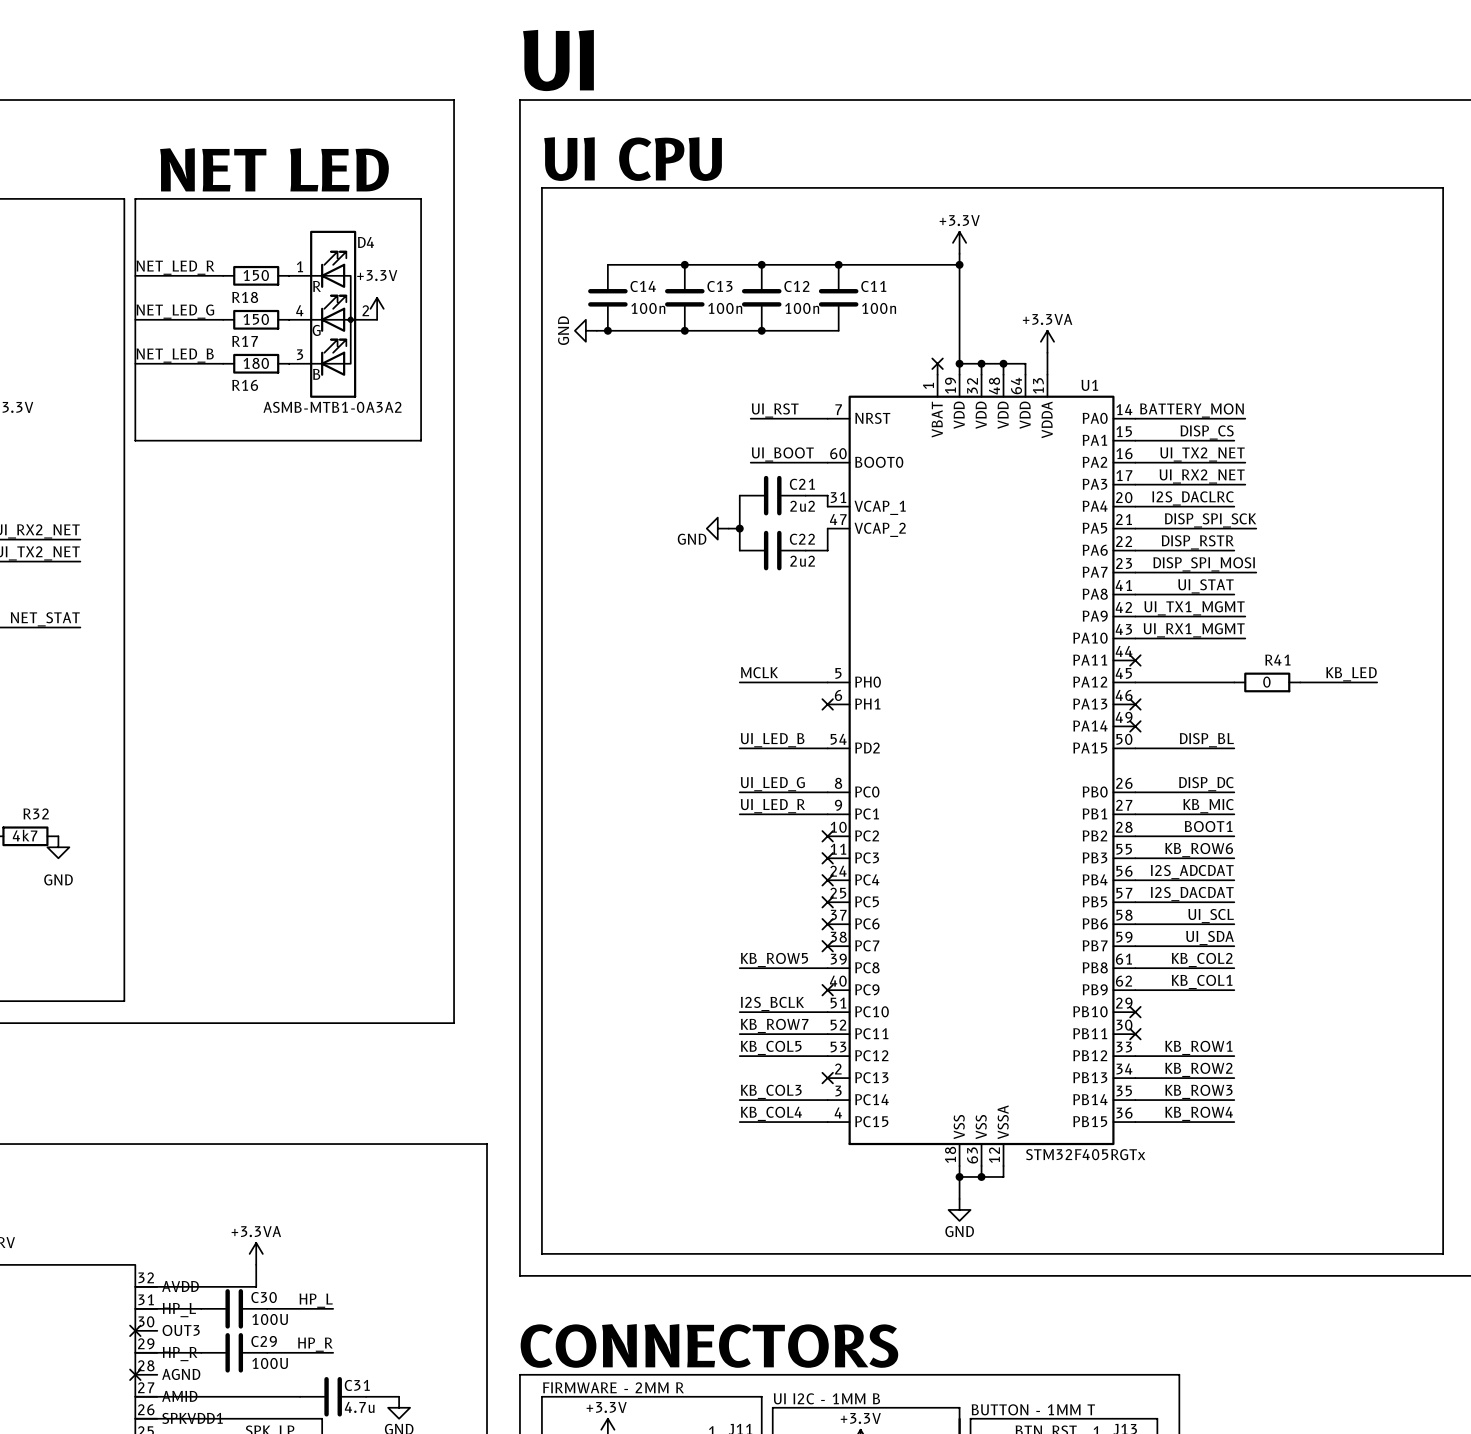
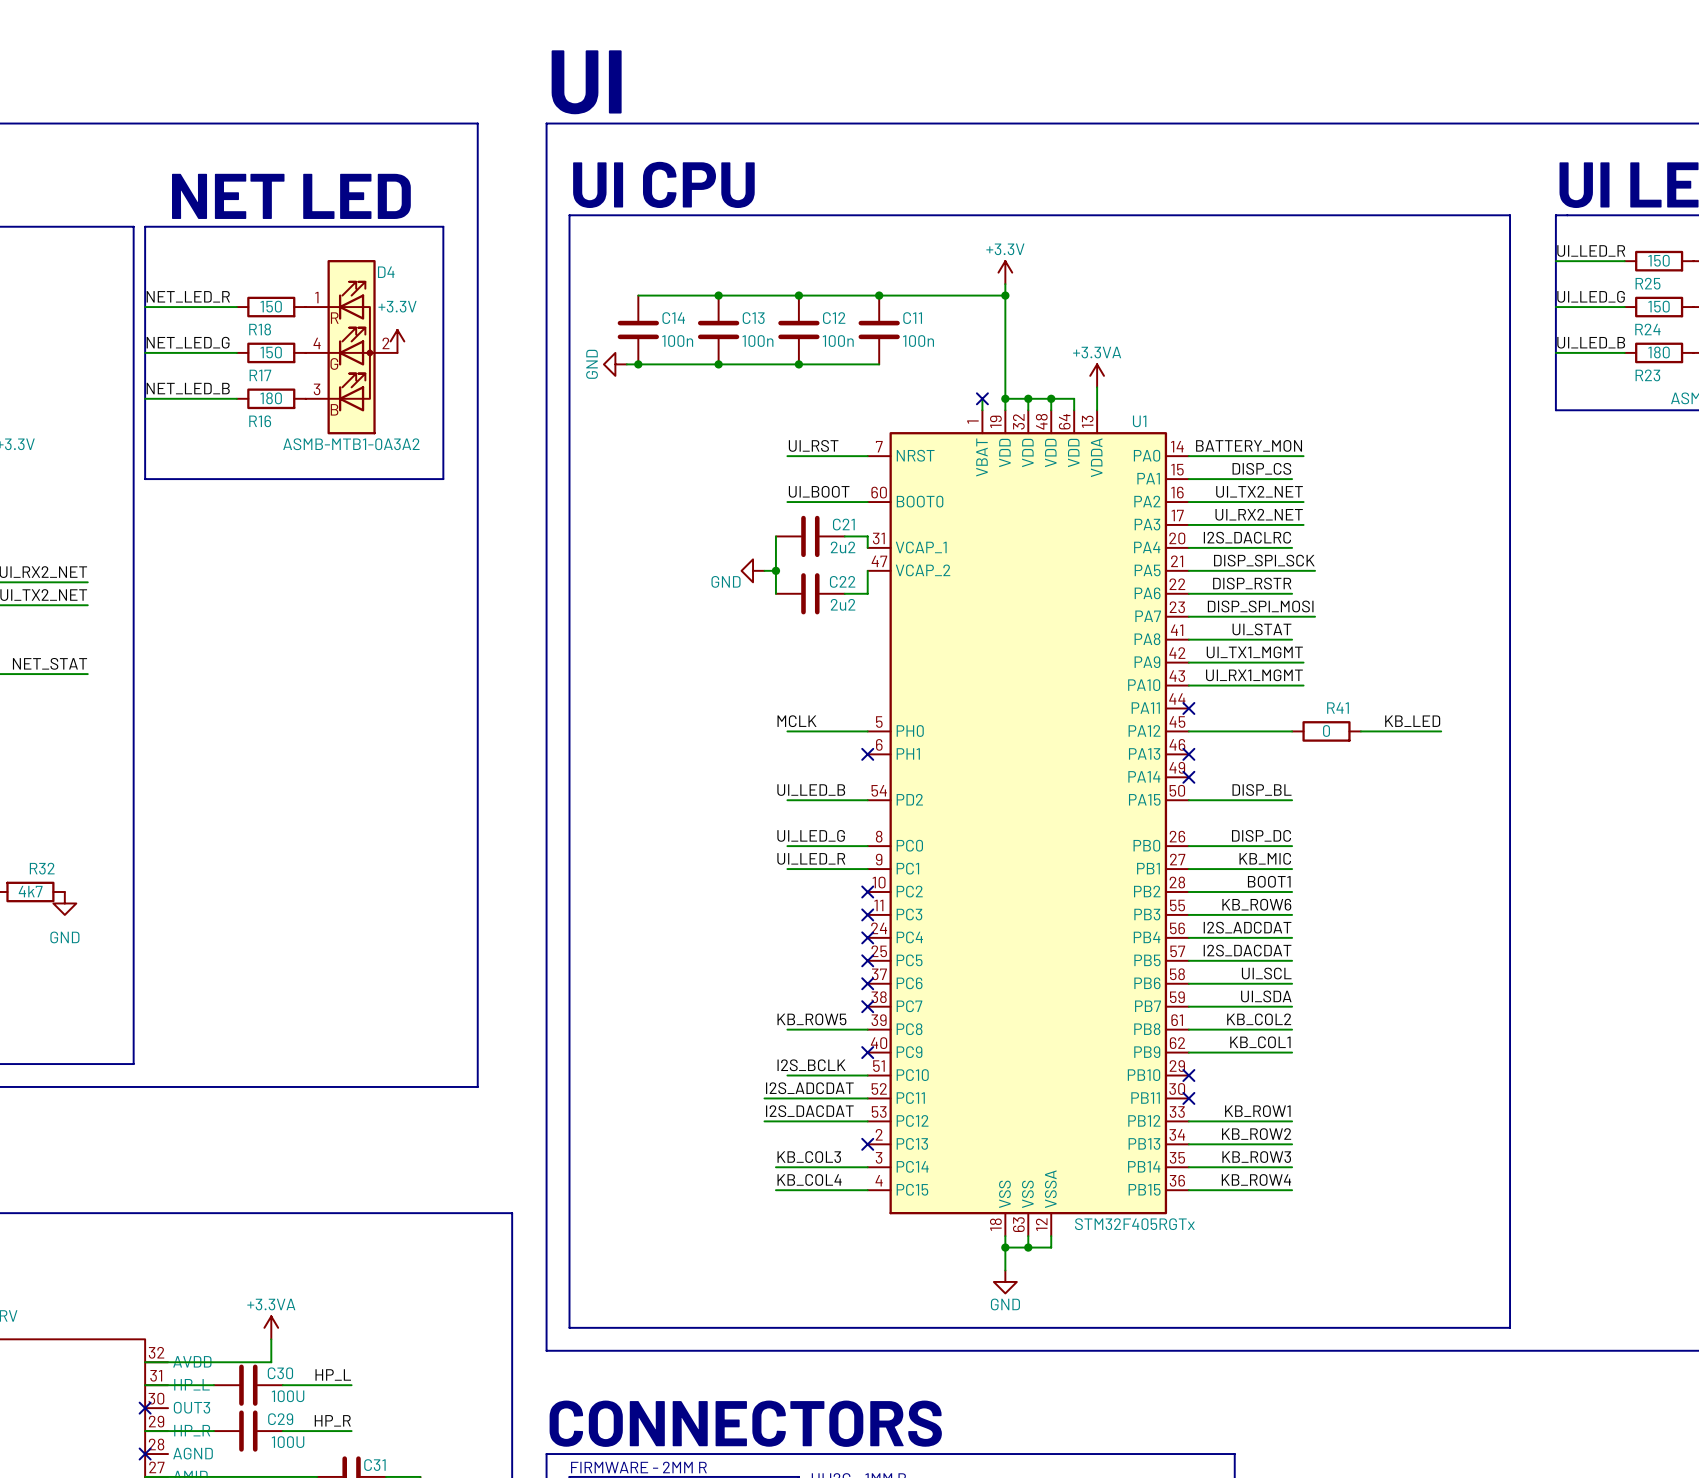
wire: (739, 682) (750, 682) -> none
wire: (739, 748) (750, 748) -> none
wire: (739, 792) (750, 792) -> none
wire: (739, 814) (750, 814) -> none
wire: (739, 968) (750, 968) -> (764, 1121) (775, 1121)
wire: (739, 1012) (750, 1012) -> (764, 1098) (775, 1098)
label: none -> I2S_ADCDAT (809, 1088)
label: KB_ROW7 (774, 1025) -> none
label: KB_COL5 (771, 1047) -> none
label: none -> I2S_DACDAT (809, 1111)

